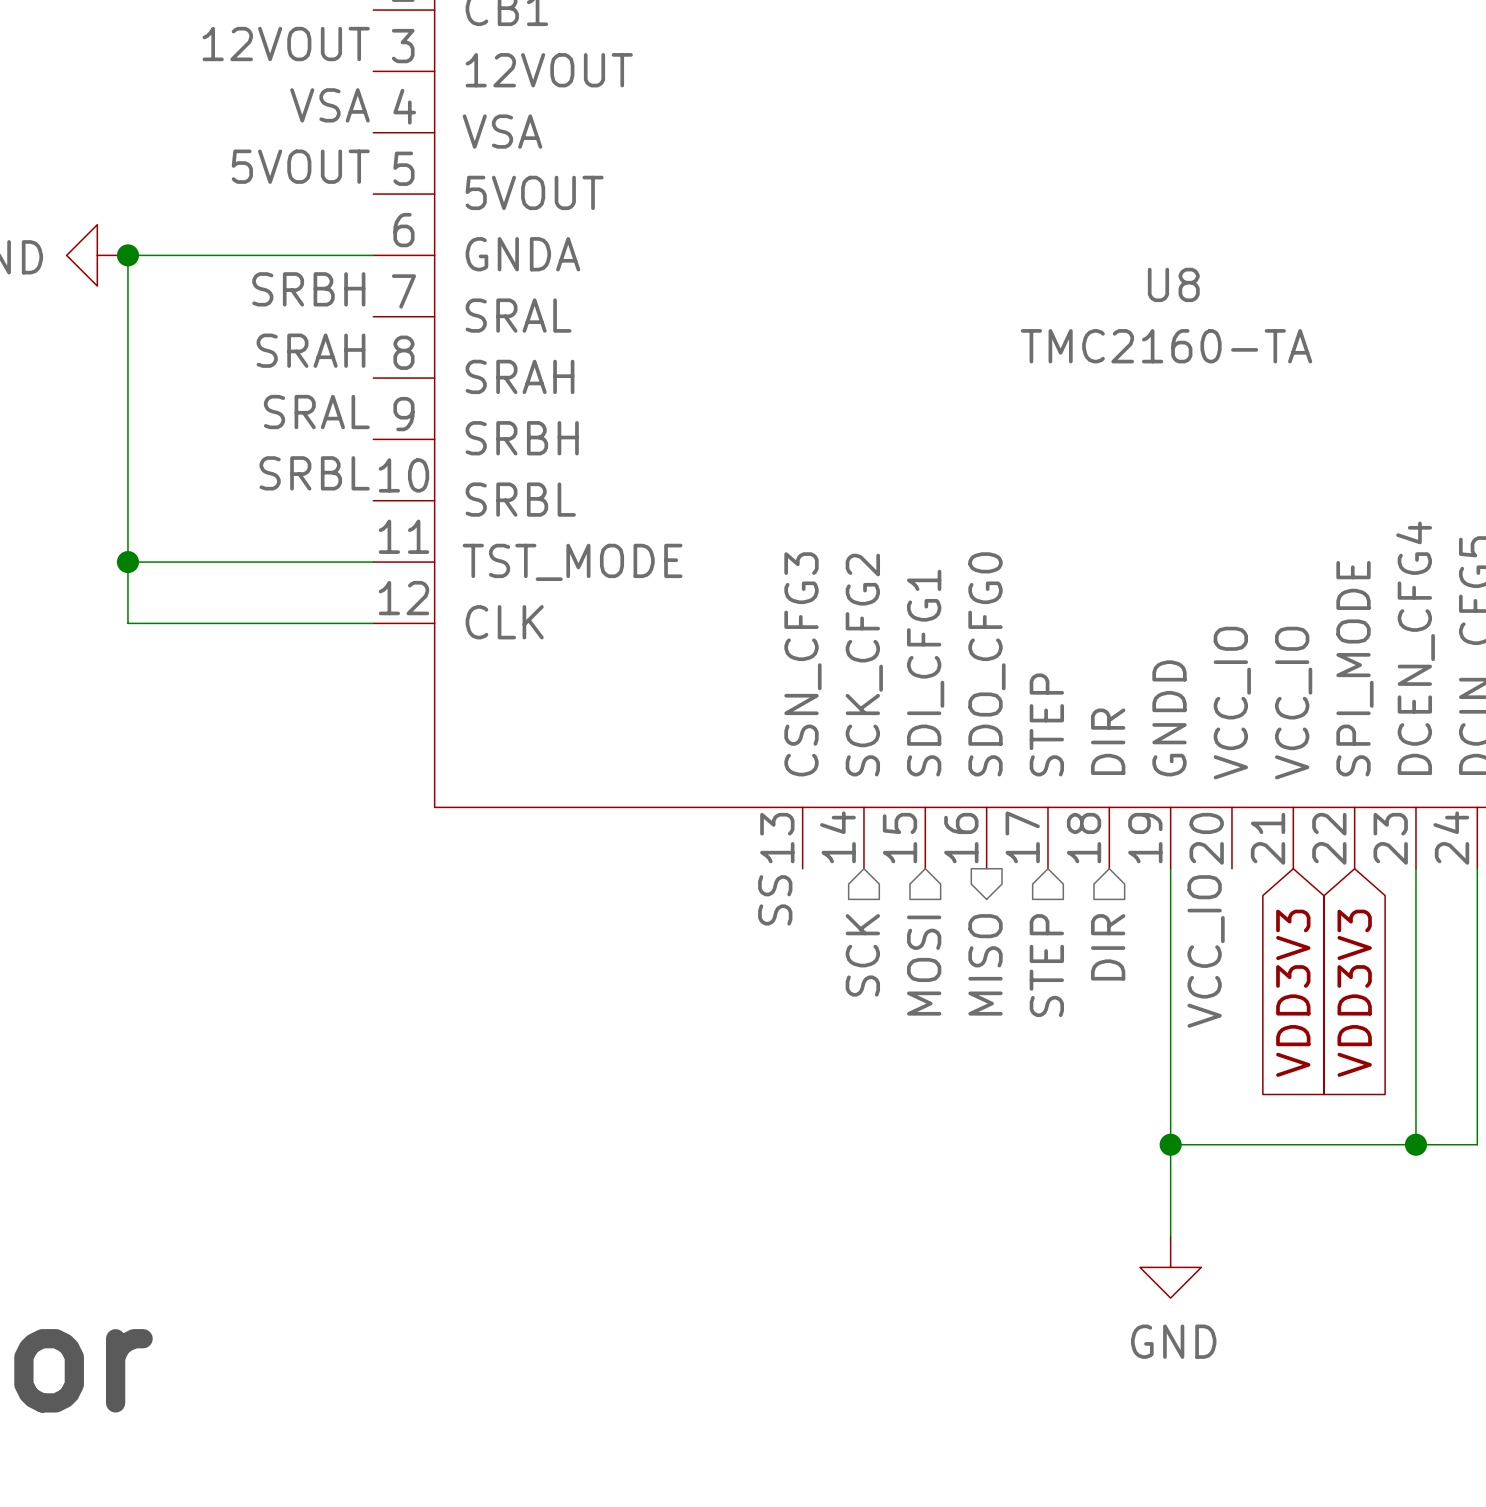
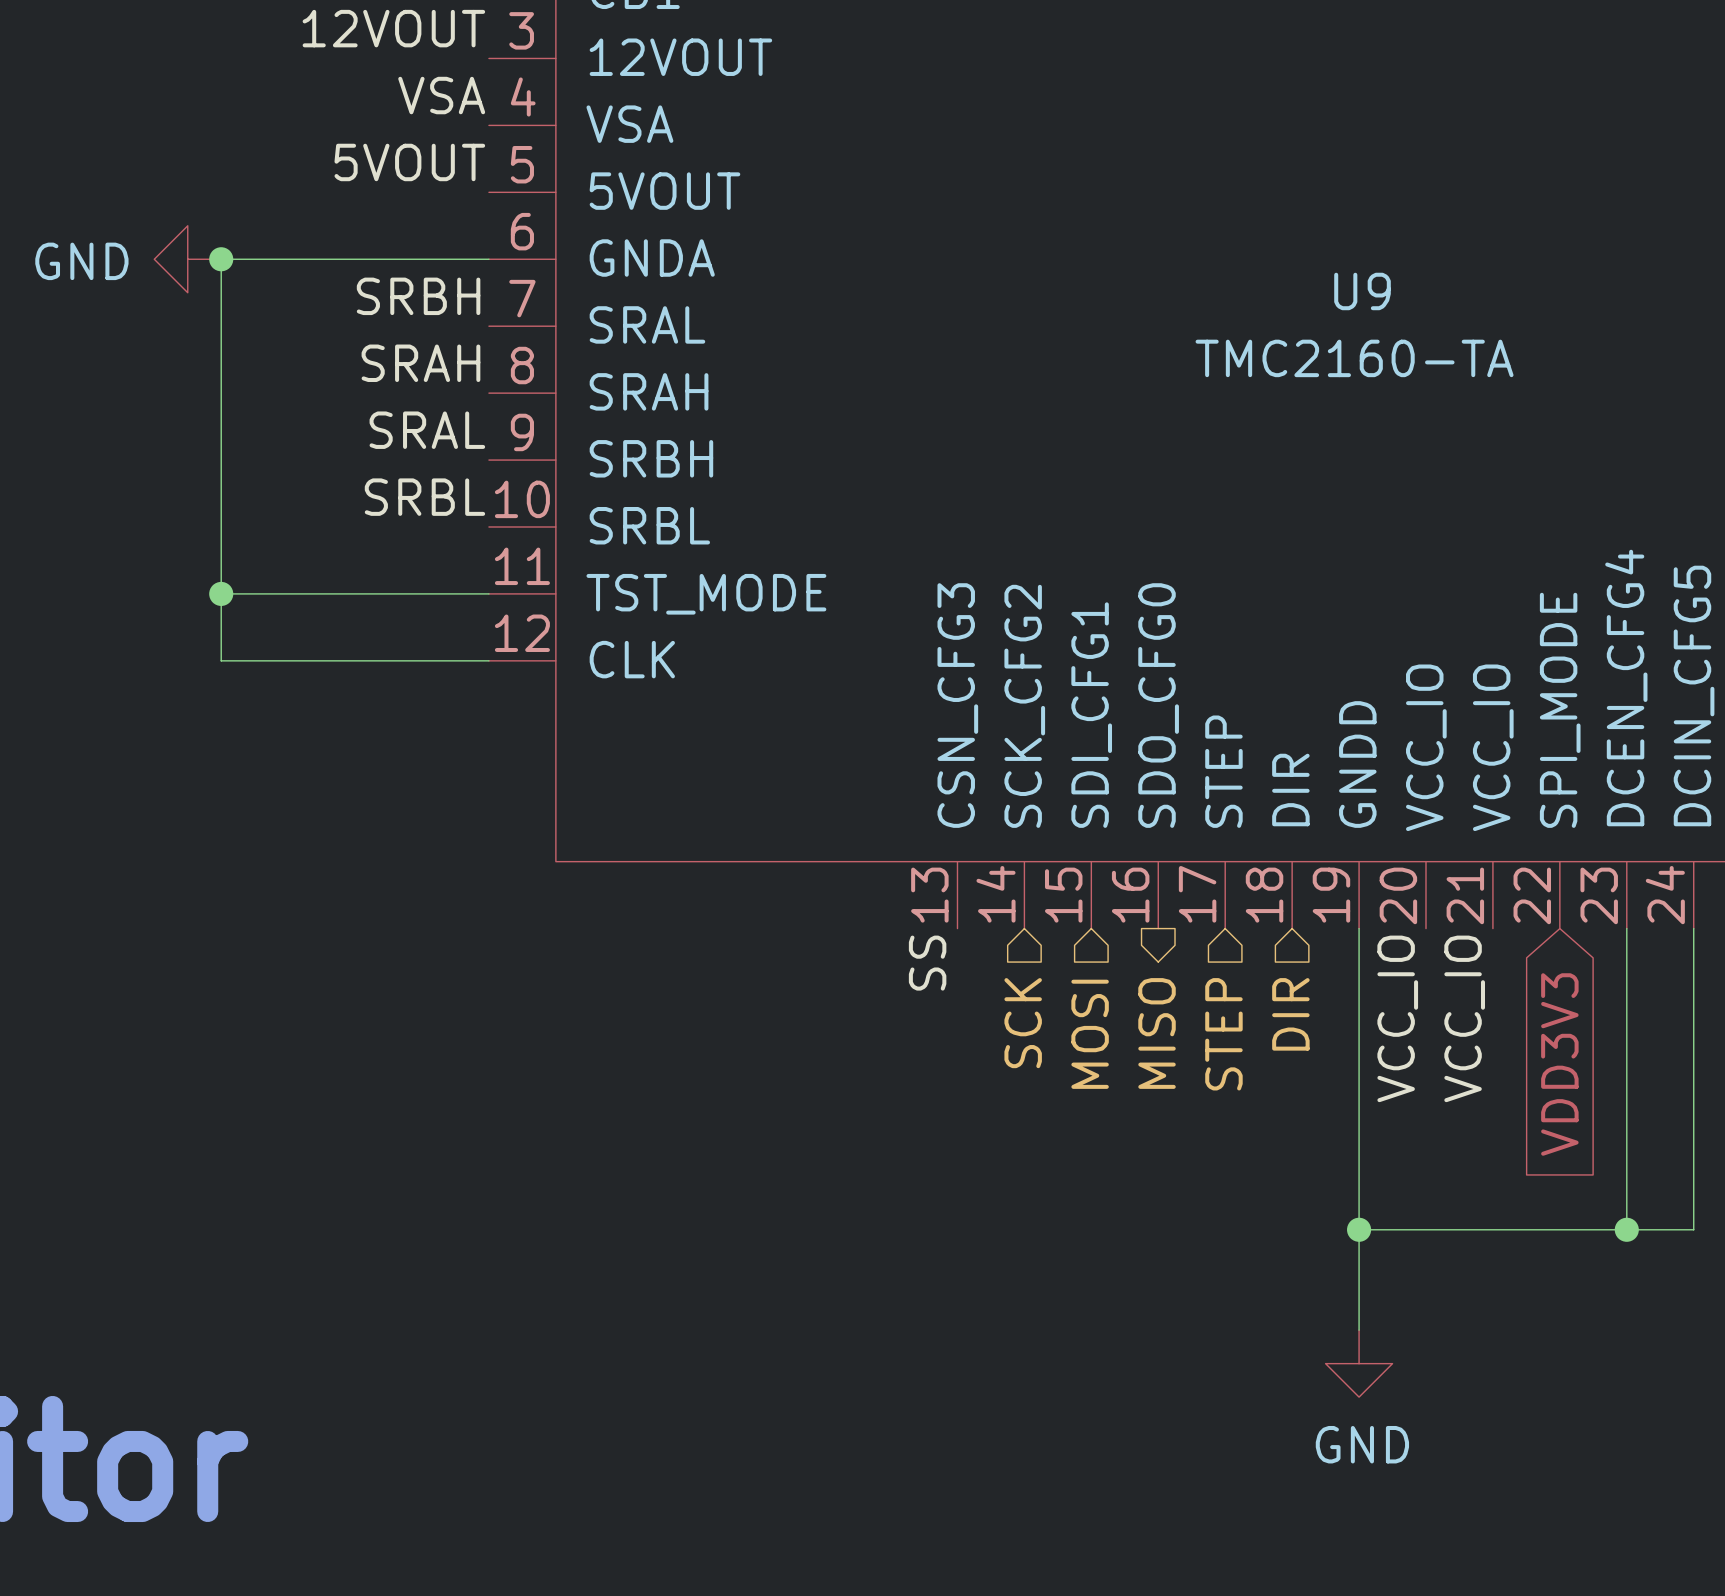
U8 name: U8 (1173, 284) -> U9 (1362, 291)
label: none -> VCC_IO (1464, 1018)
global label: VDD3V3 (1293, 993) -> none

